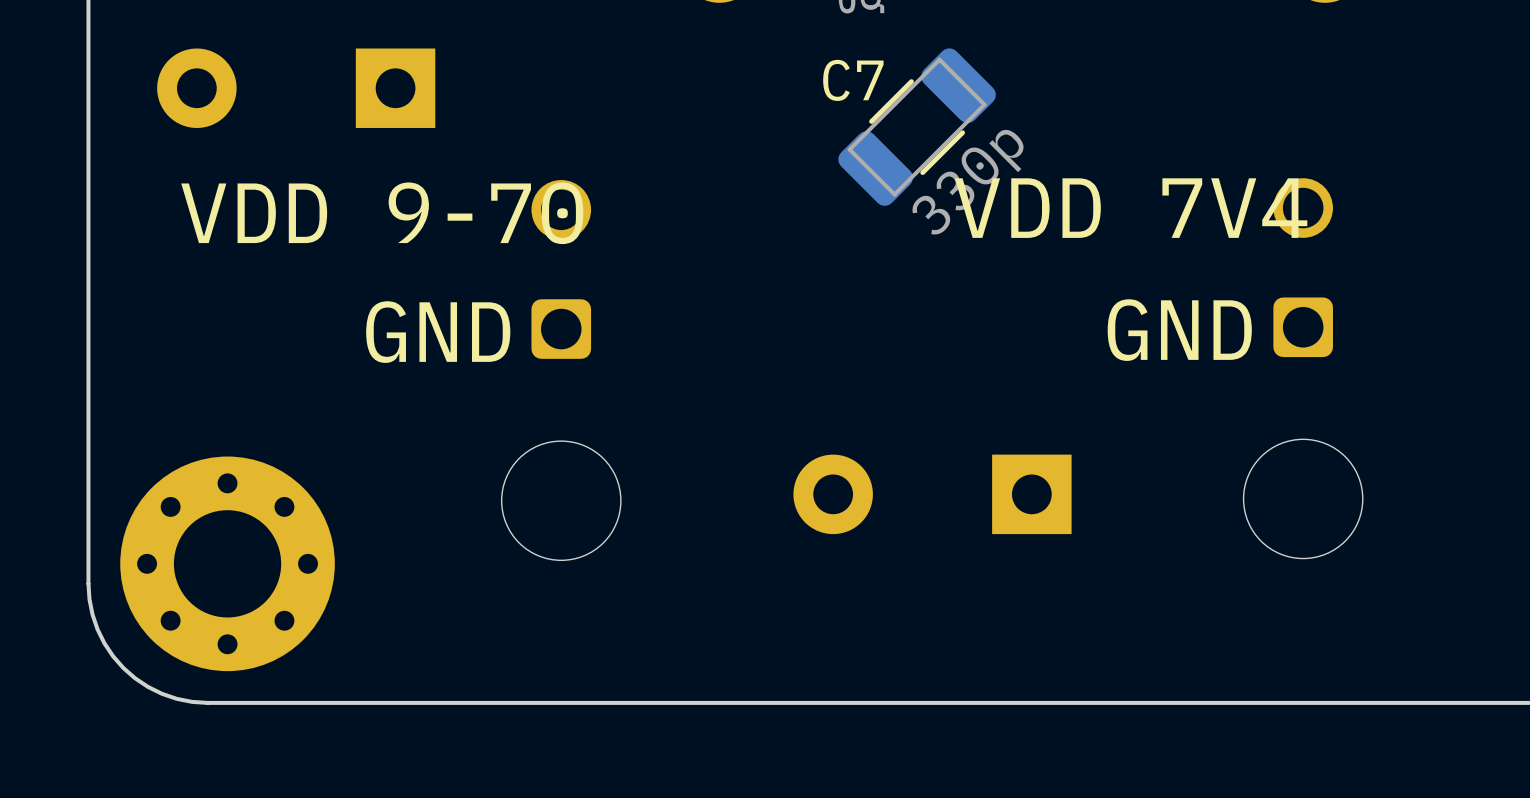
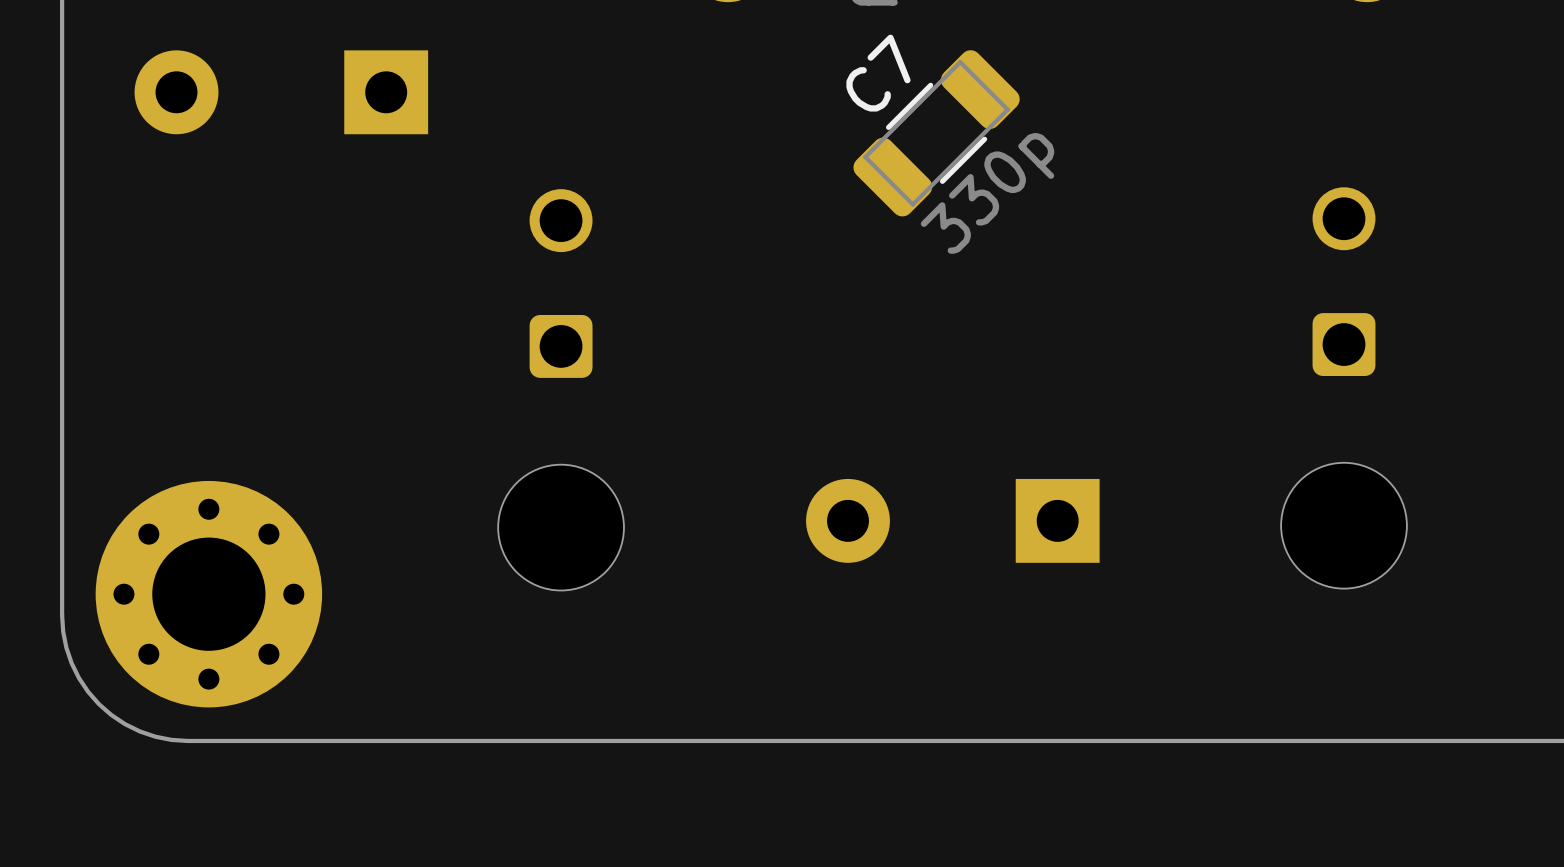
C7 name rotation: 0° (853, 80) -> 45° counterclockwise (878, 73)
text: VDD 7V4 (1131, 208) -> none
text: VDD 9-70 (382, 213) -> none
text: GND (1179, 330) -> none
text: GND (438, 332) -> none

